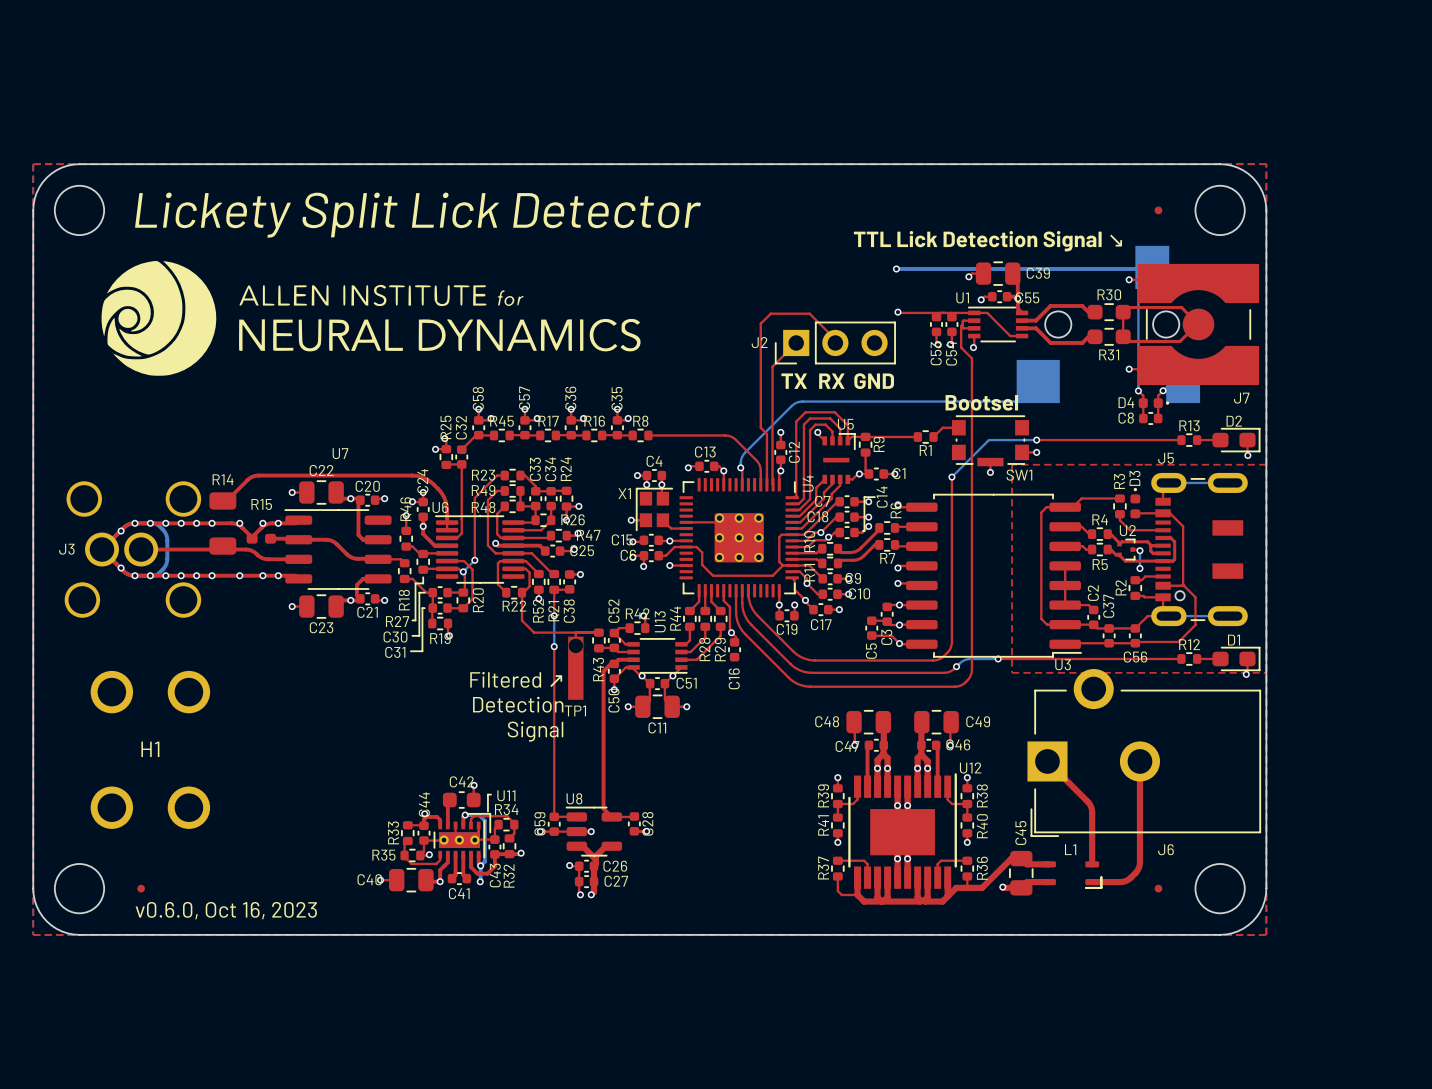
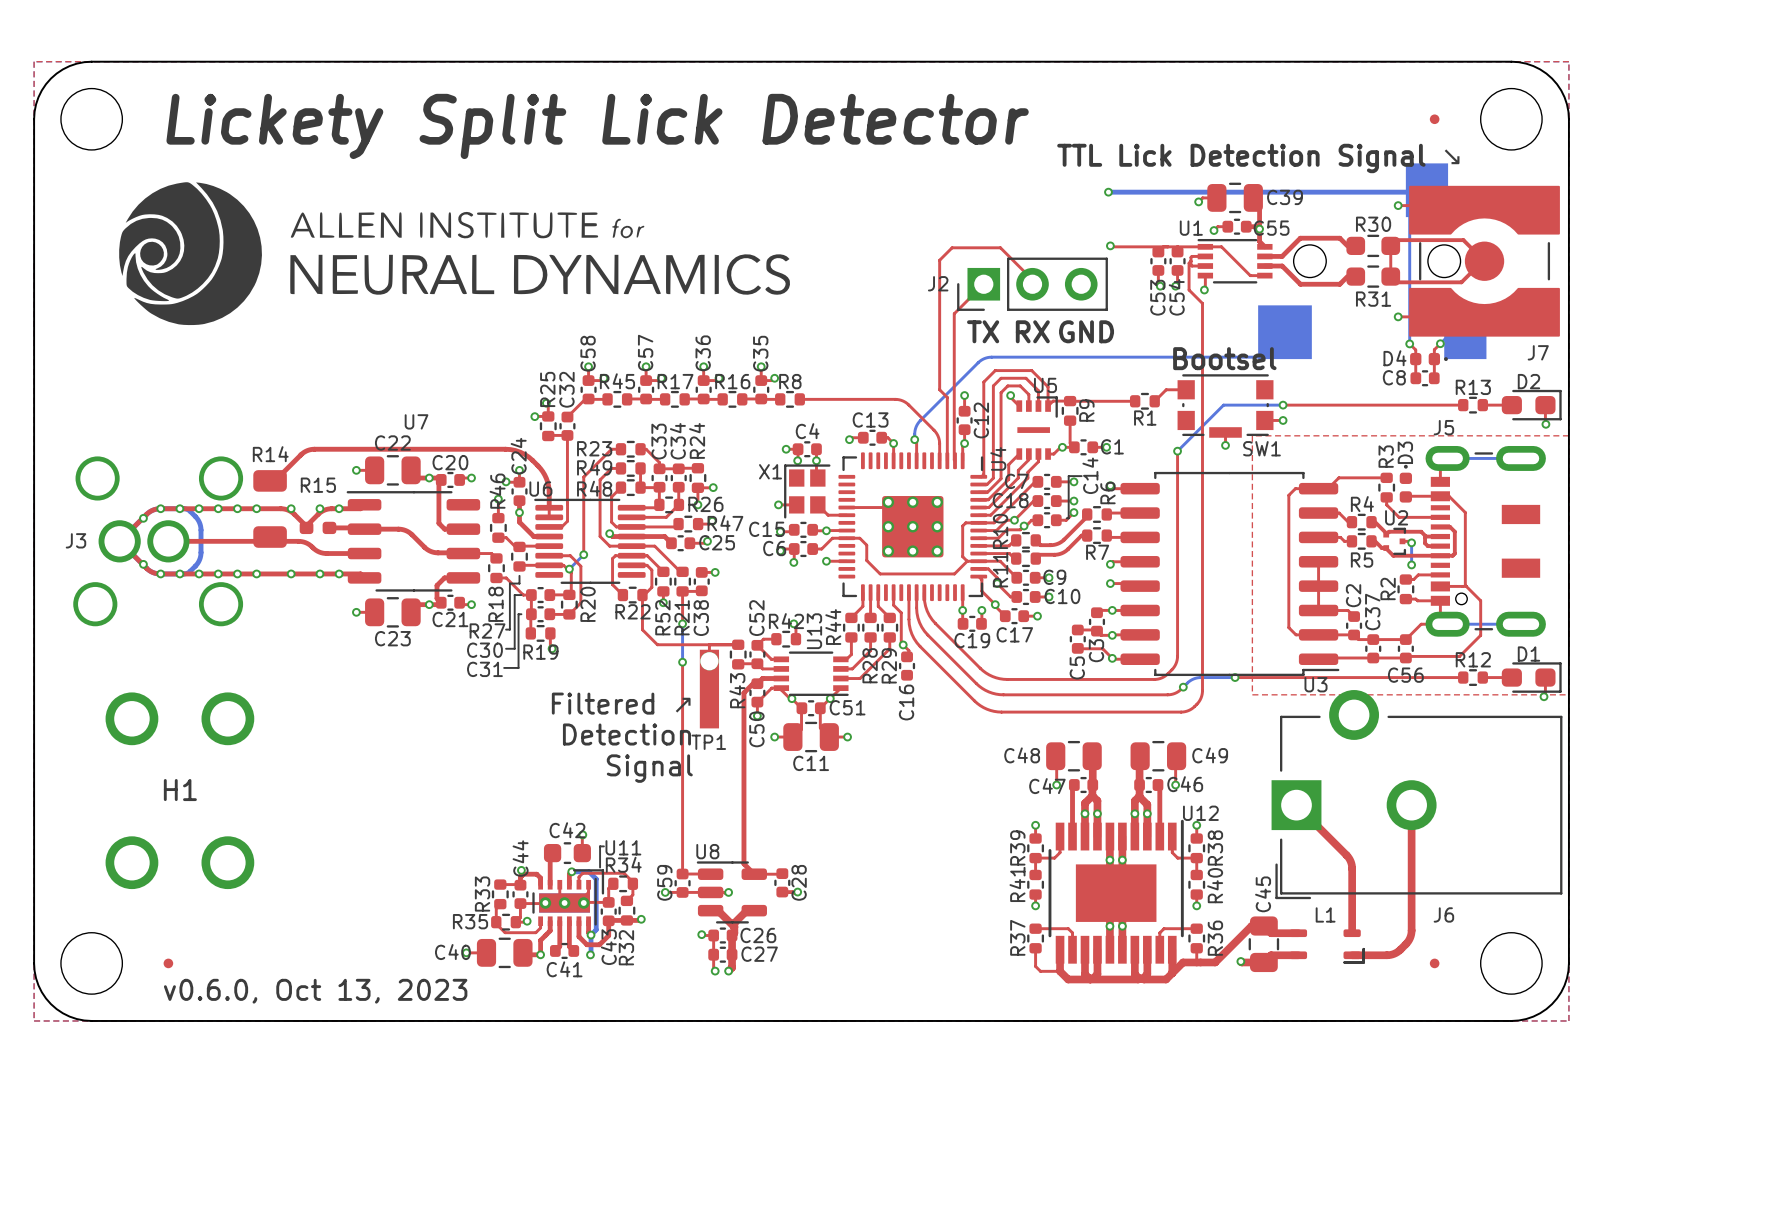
text: v0.6.0, Oct 16, 2023 (226, 910) -> v0.6.0, Oct 13, 2023 (315, 991)

